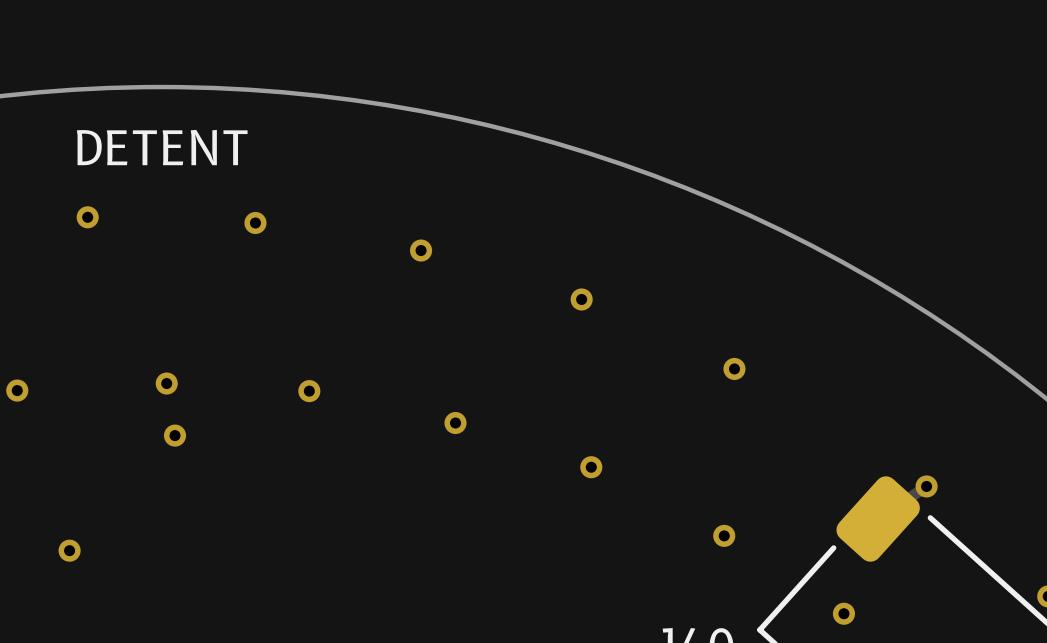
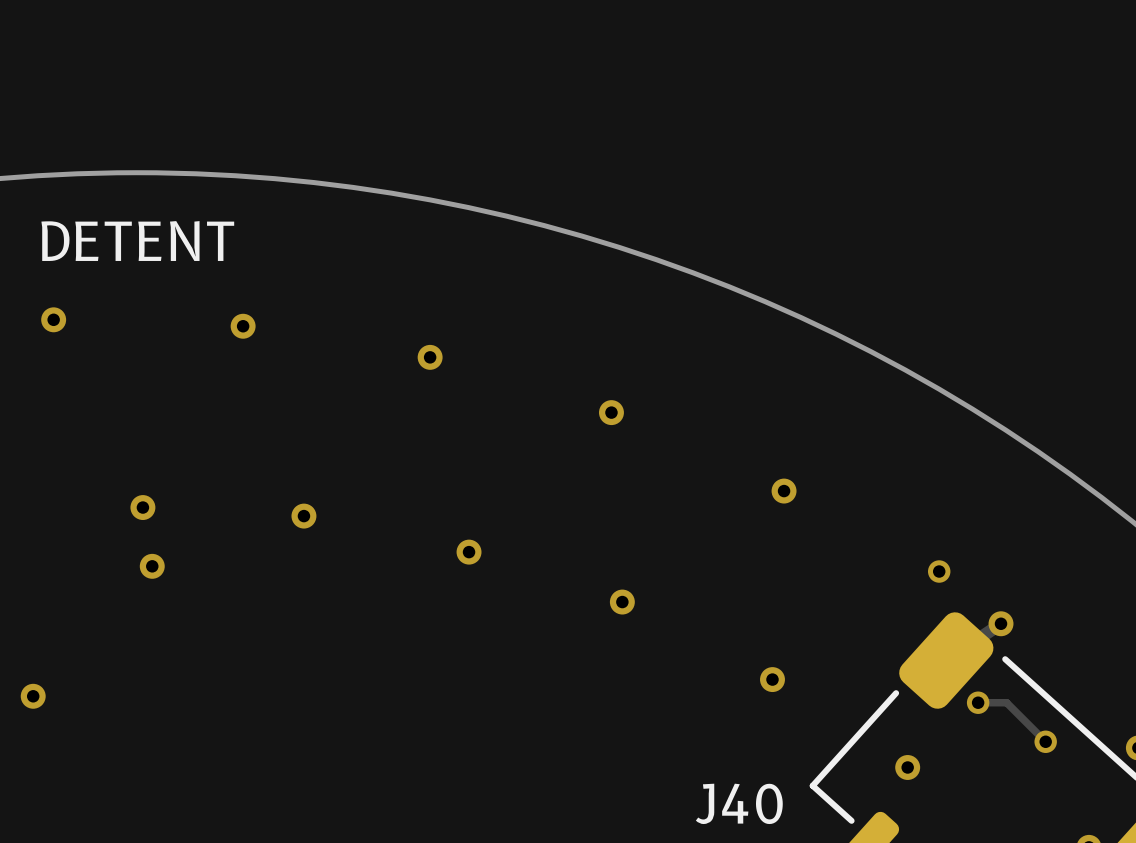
via: none -> (939, 571)
track: none -> (978, 702) (1006, 702) (1045, 741)
via: none -> (978, 702)
via: none -> (1045, 741)

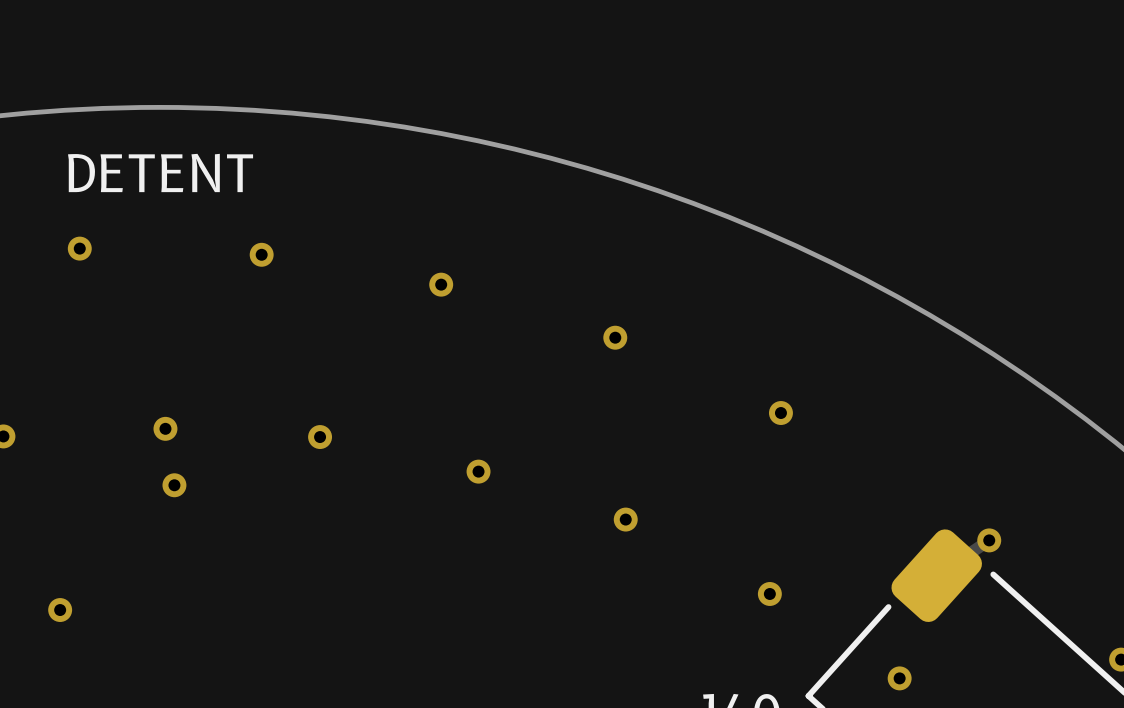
via: (939, 571) -> none
track: (978, 702) (1006, 702) (1045, 741) -> none
via: (978, 702) -> none
via: (1045, 741) -> none

